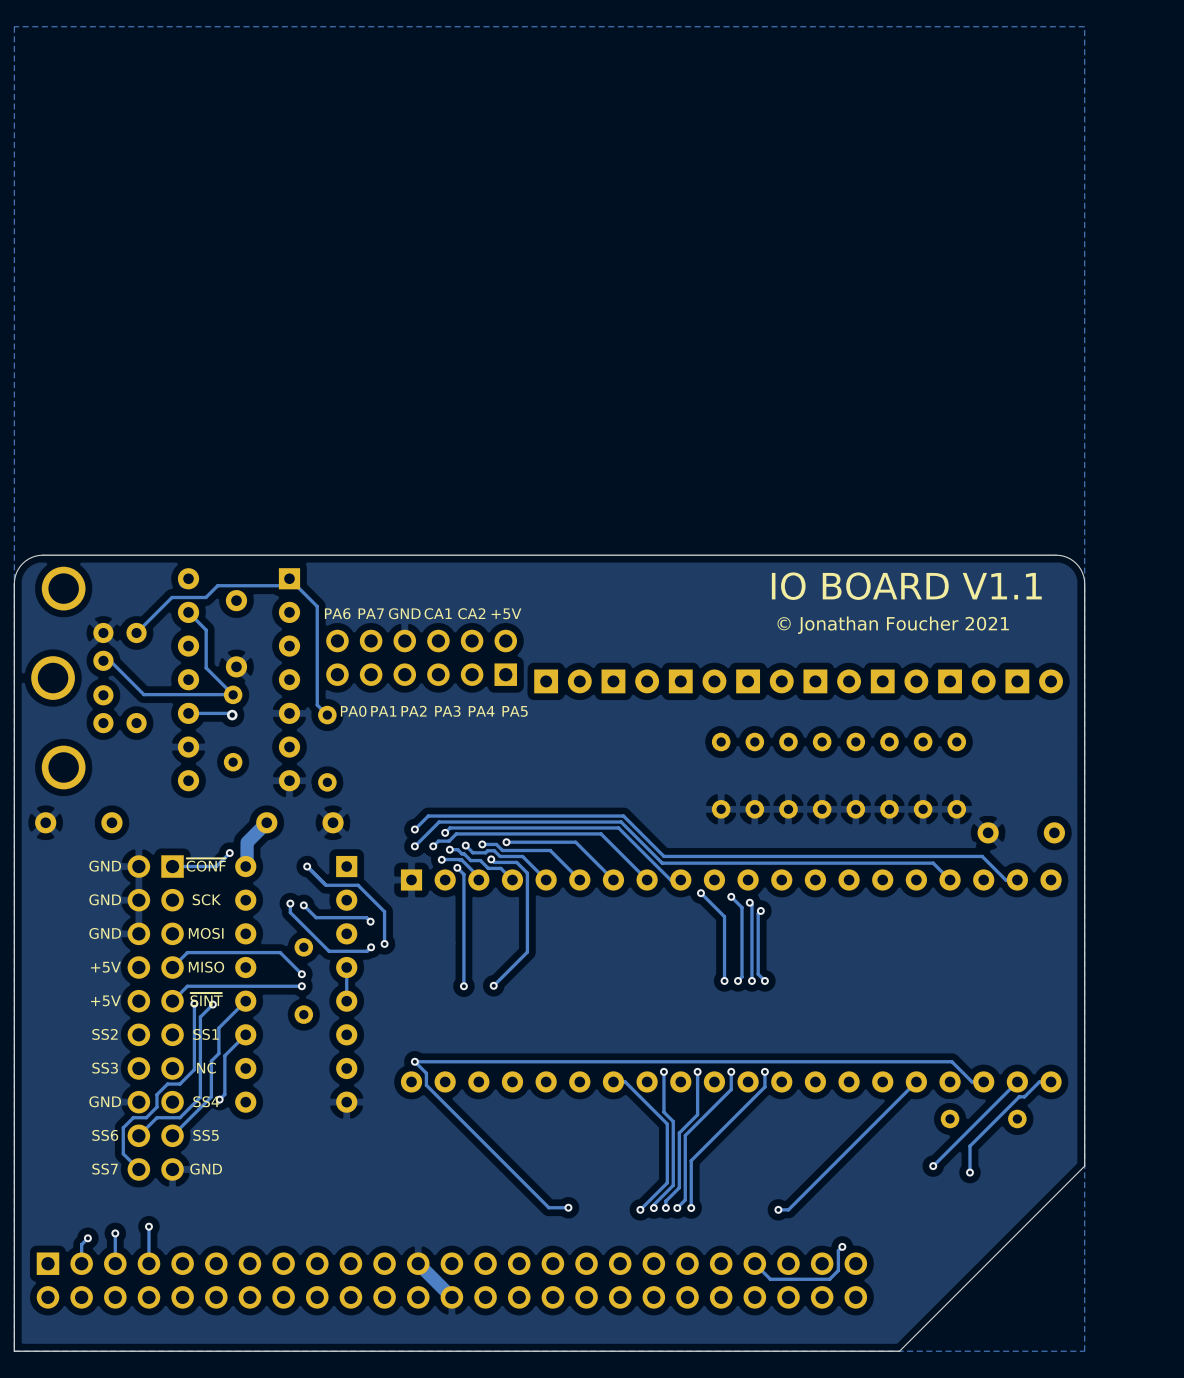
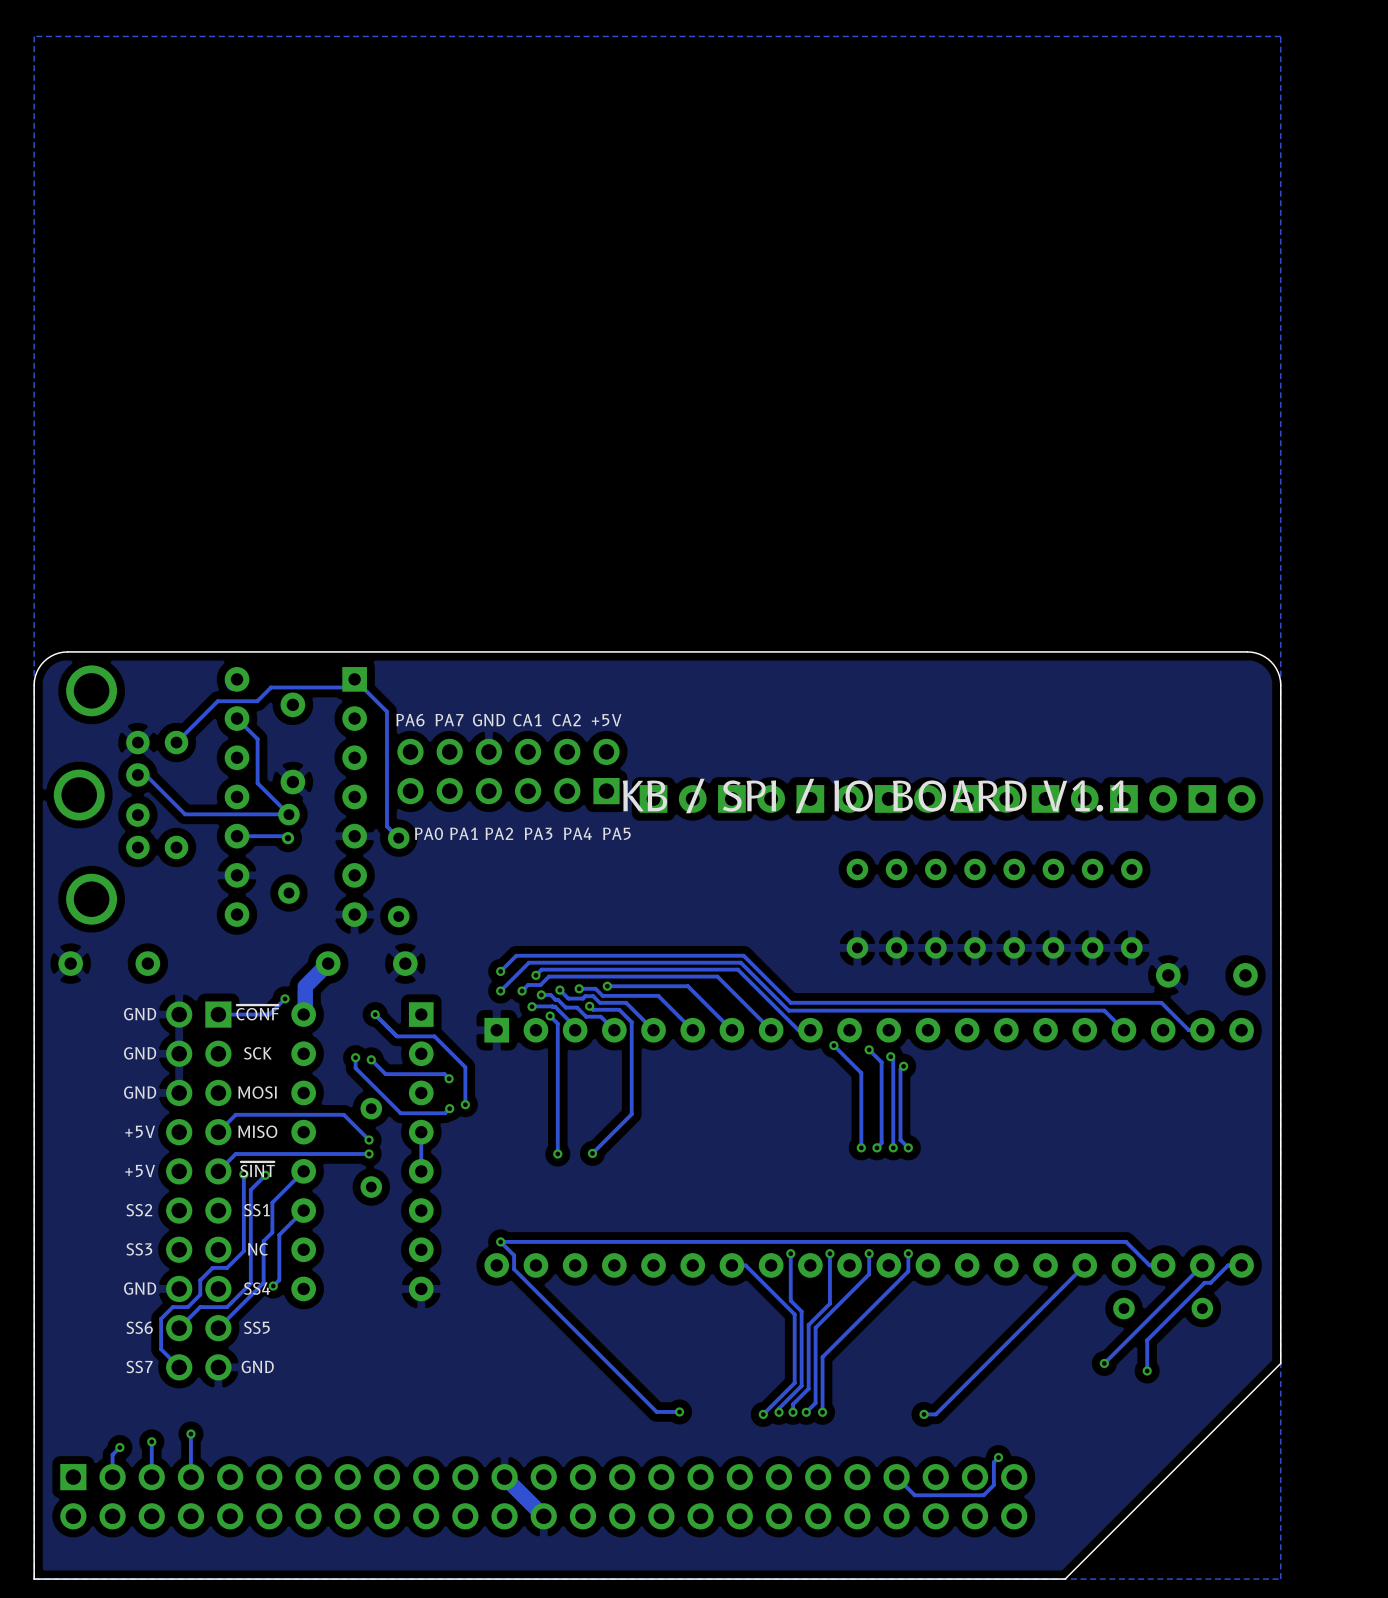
text: IO BOARD V1.1 (906, 586) -> none
text: © Jonathan Foucher 2021 (893, 625) -> none
text: none -> KB / SPI / IO BOARD V1.1 (875, 796)

